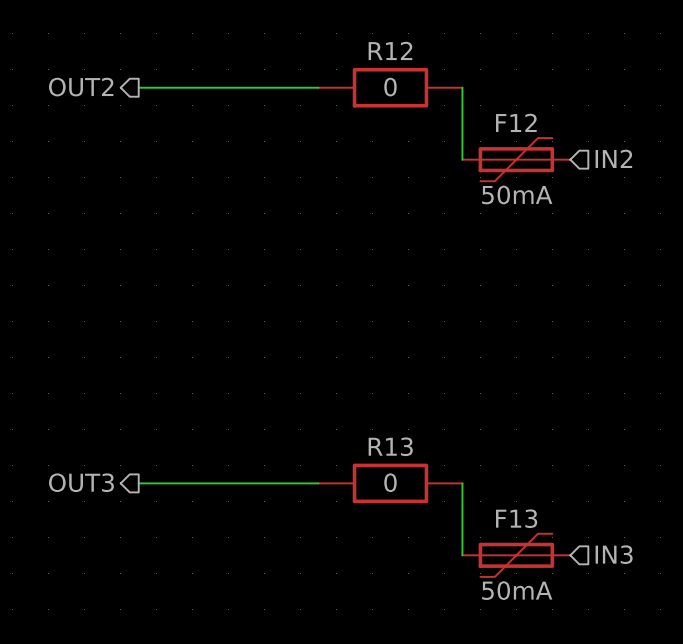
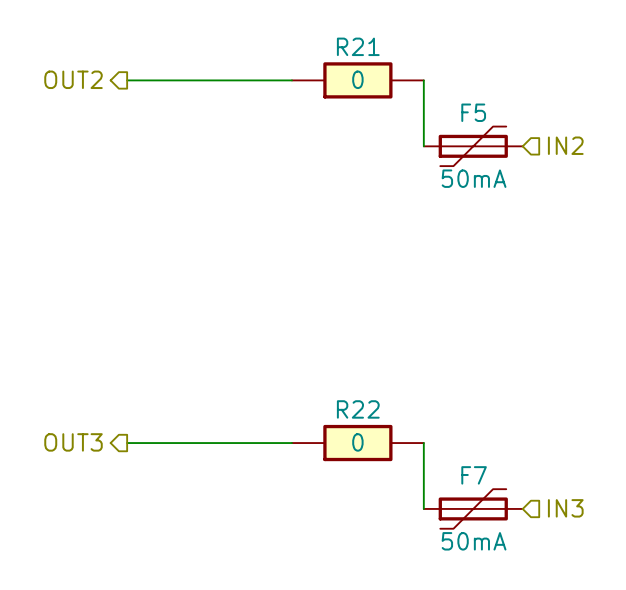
R12 name: R12 (390, 50) -> R21 (358, 46)
F12 name: F12 (516, 122) -> F5 (473, 112)
R13 name: R13 (390, 446) -> R22 (358, 409)
F13 name: F13 (516, 518) -> F7 (474, 475)

